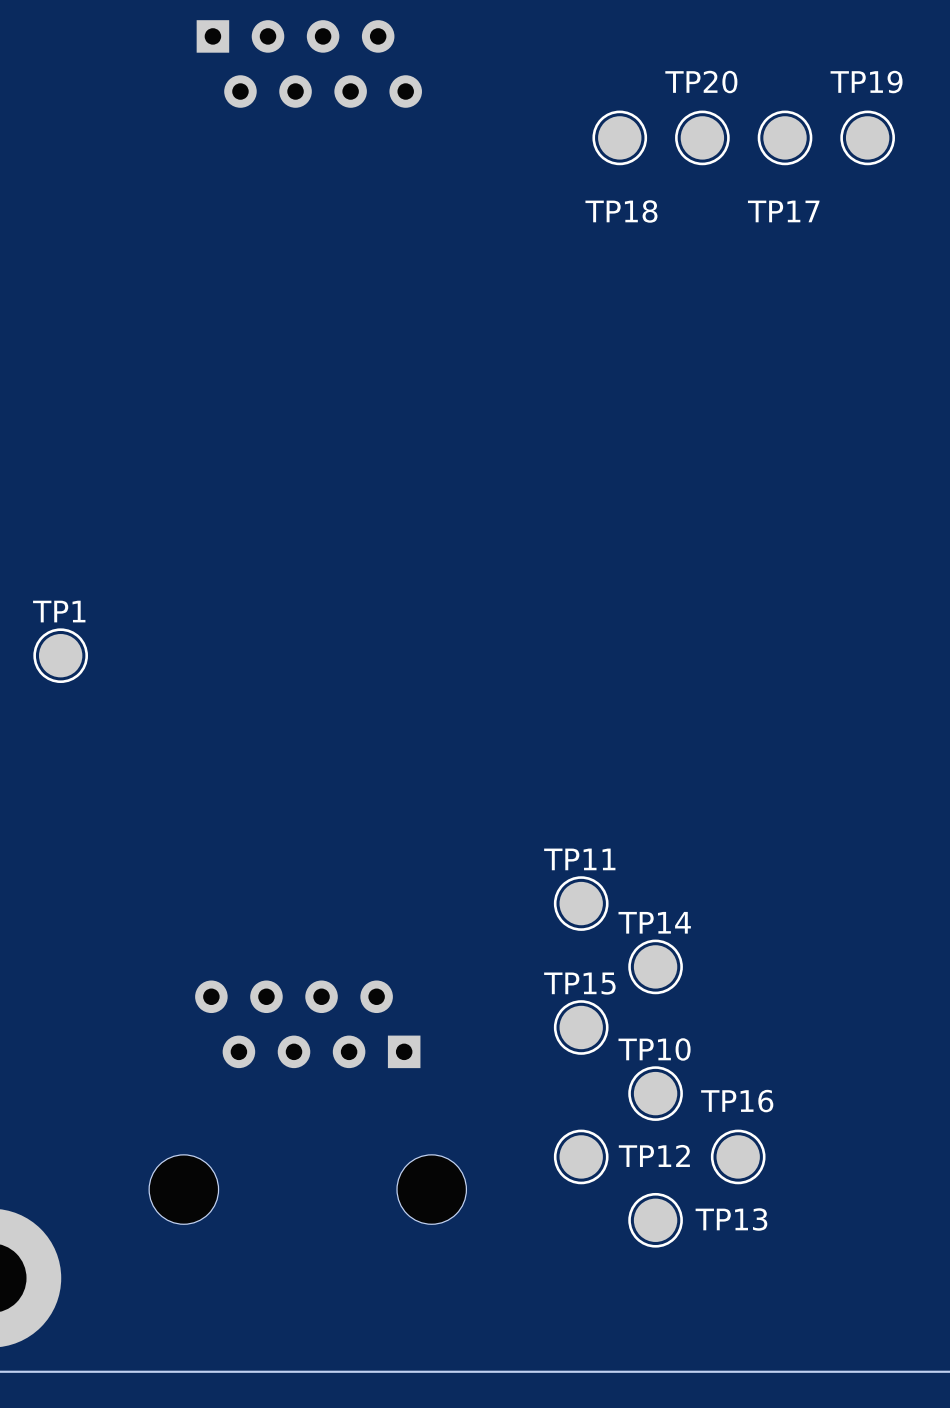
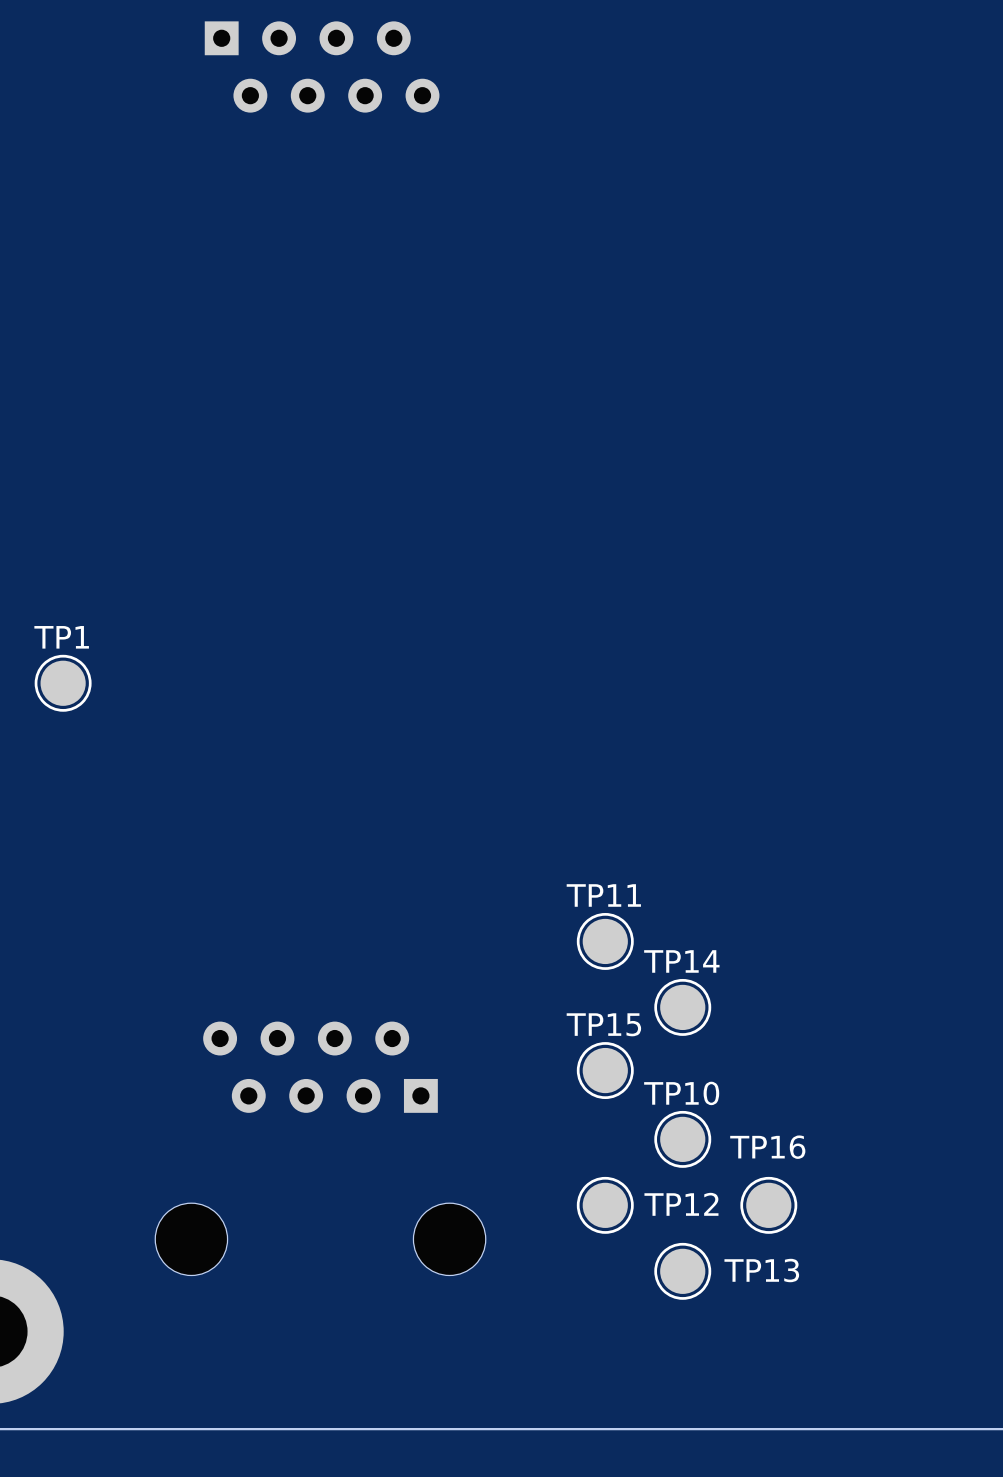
TP18: (619, 137) -> none
TP20: (702, 137) -> none
TP17: (785, 137) -> none
TP19: (867, 137) -> none

